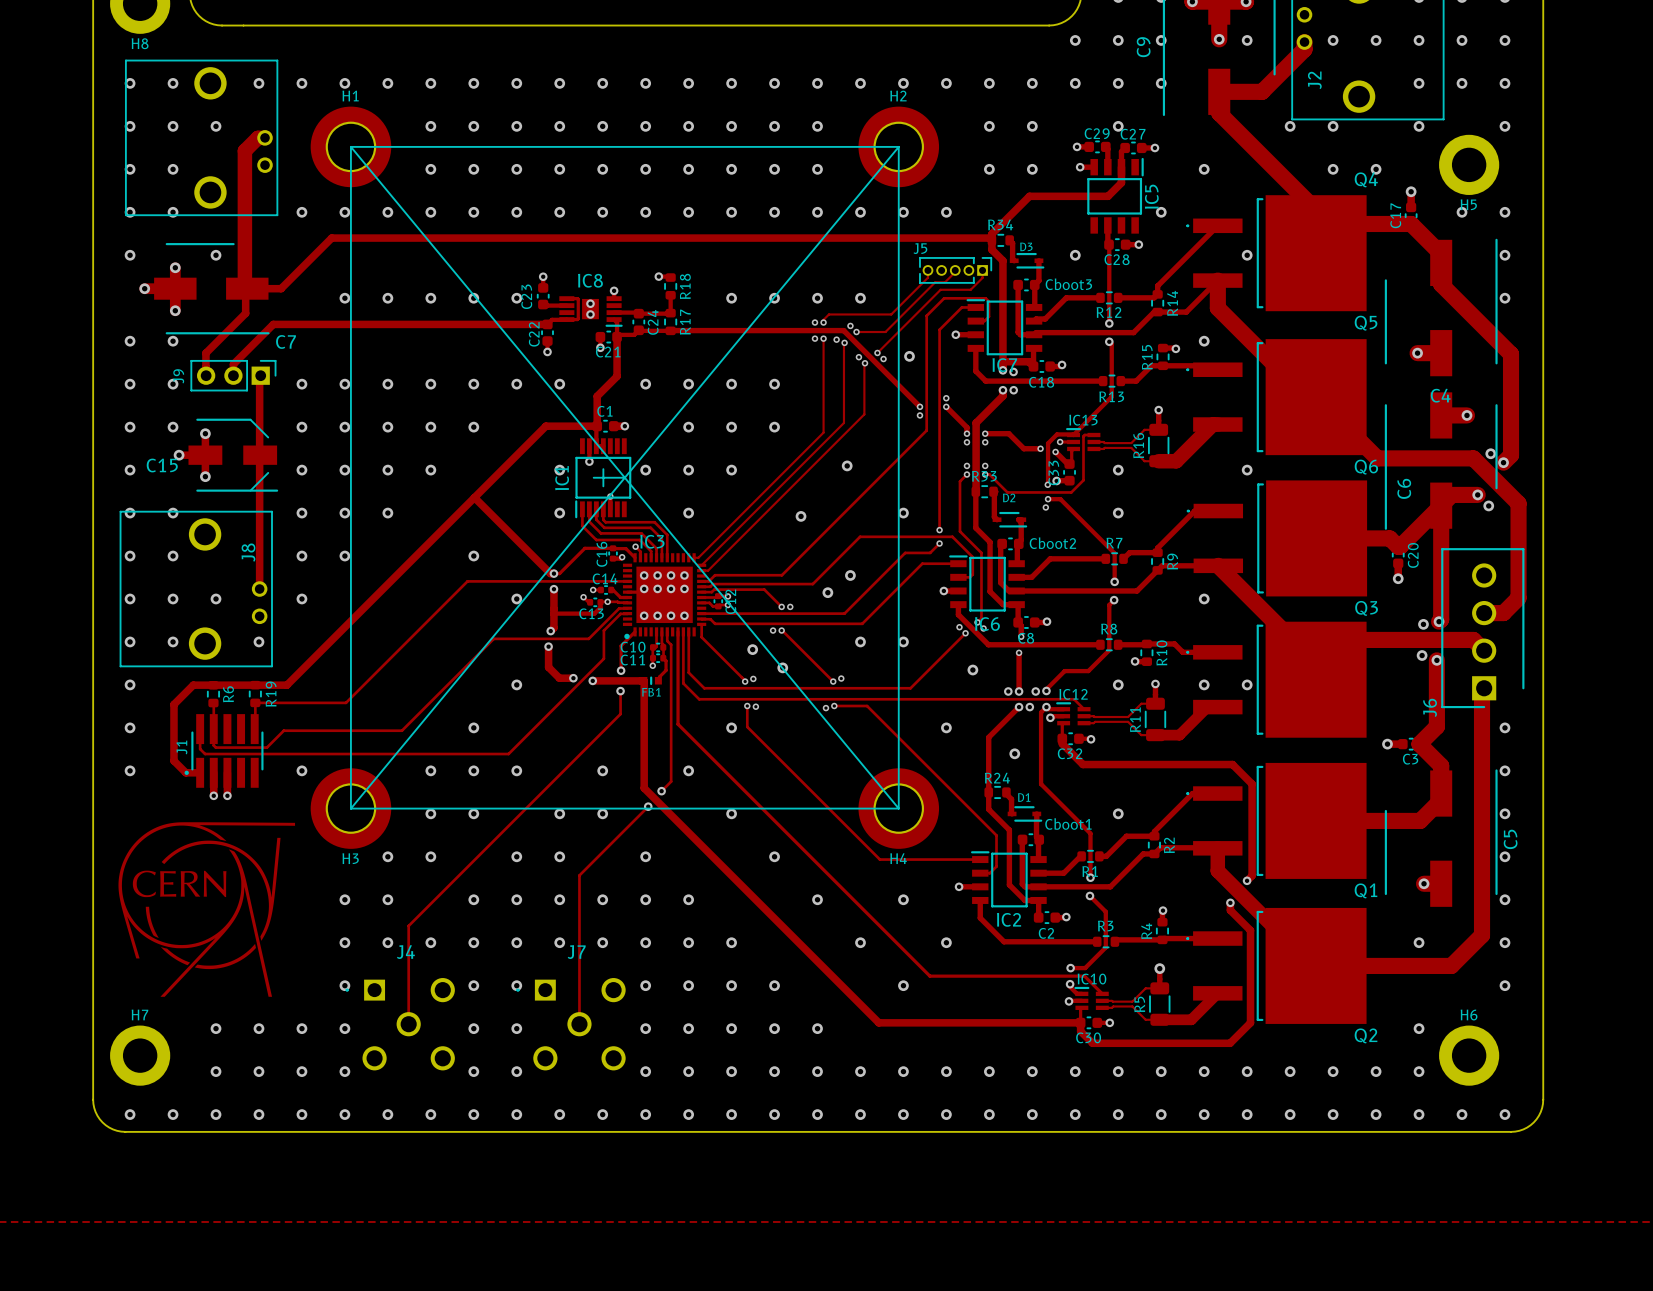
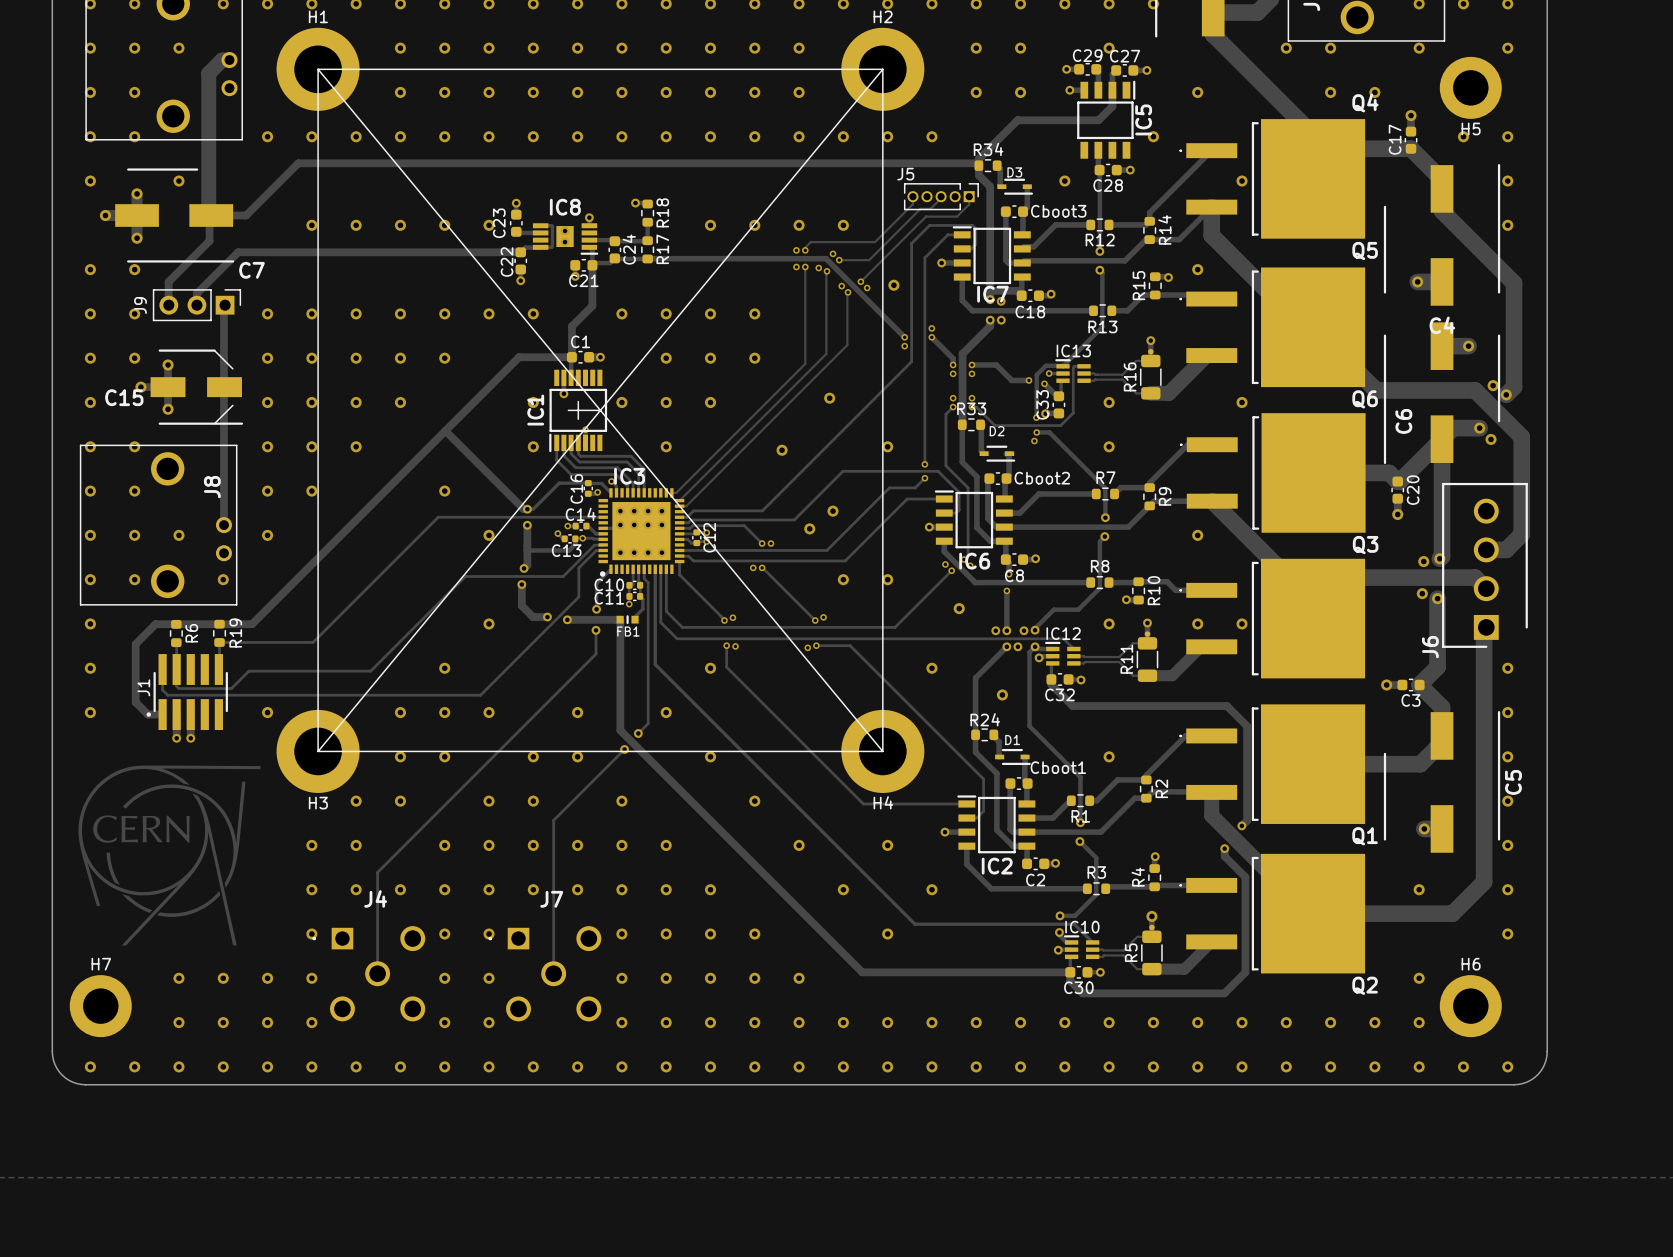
via: (752, 649) -> none
via: (782, 667) -> none

